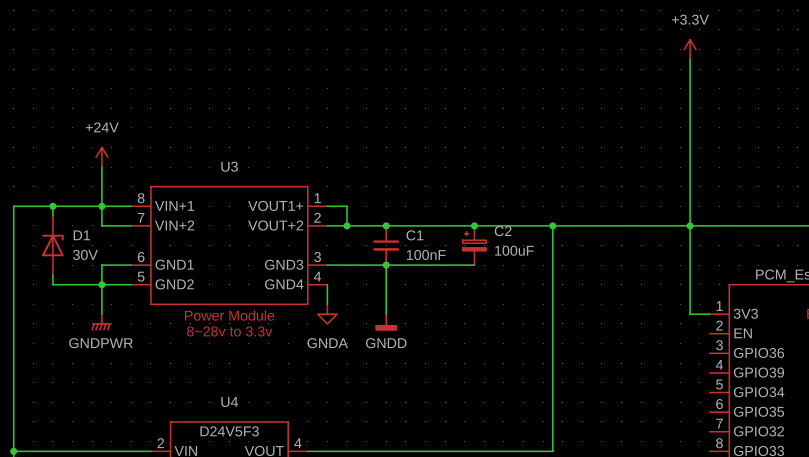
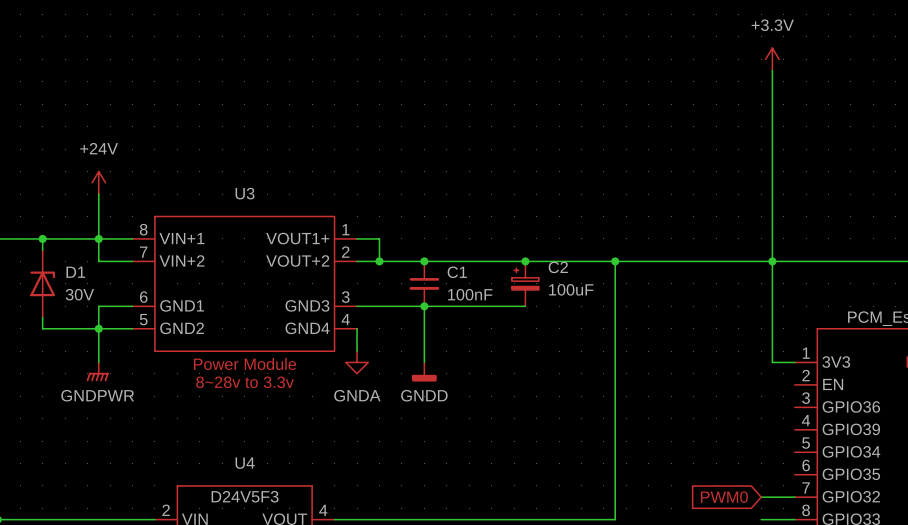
global label: none -> PWM0 (724, 497)
wire: none -> (761, 497) (794, 497)
wire: none -> (761, 519) (794, 519)

